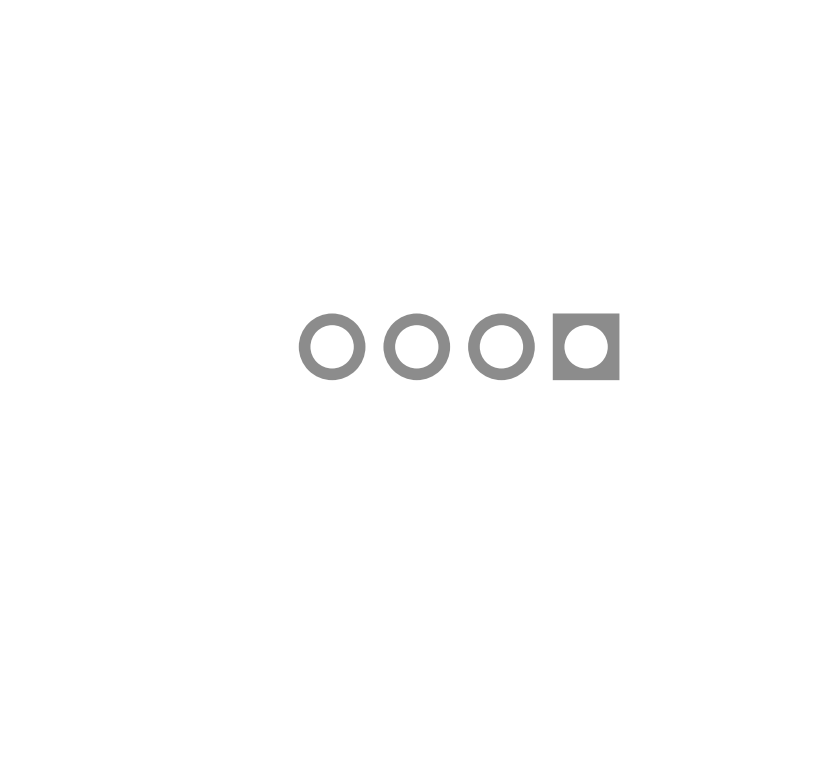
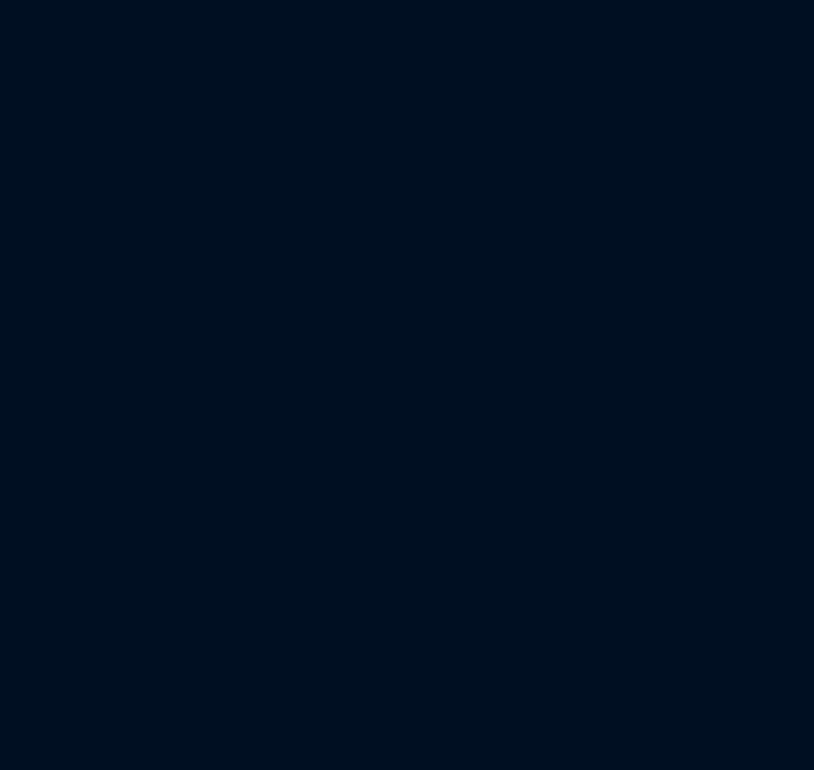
part: (459, 346) -> none

